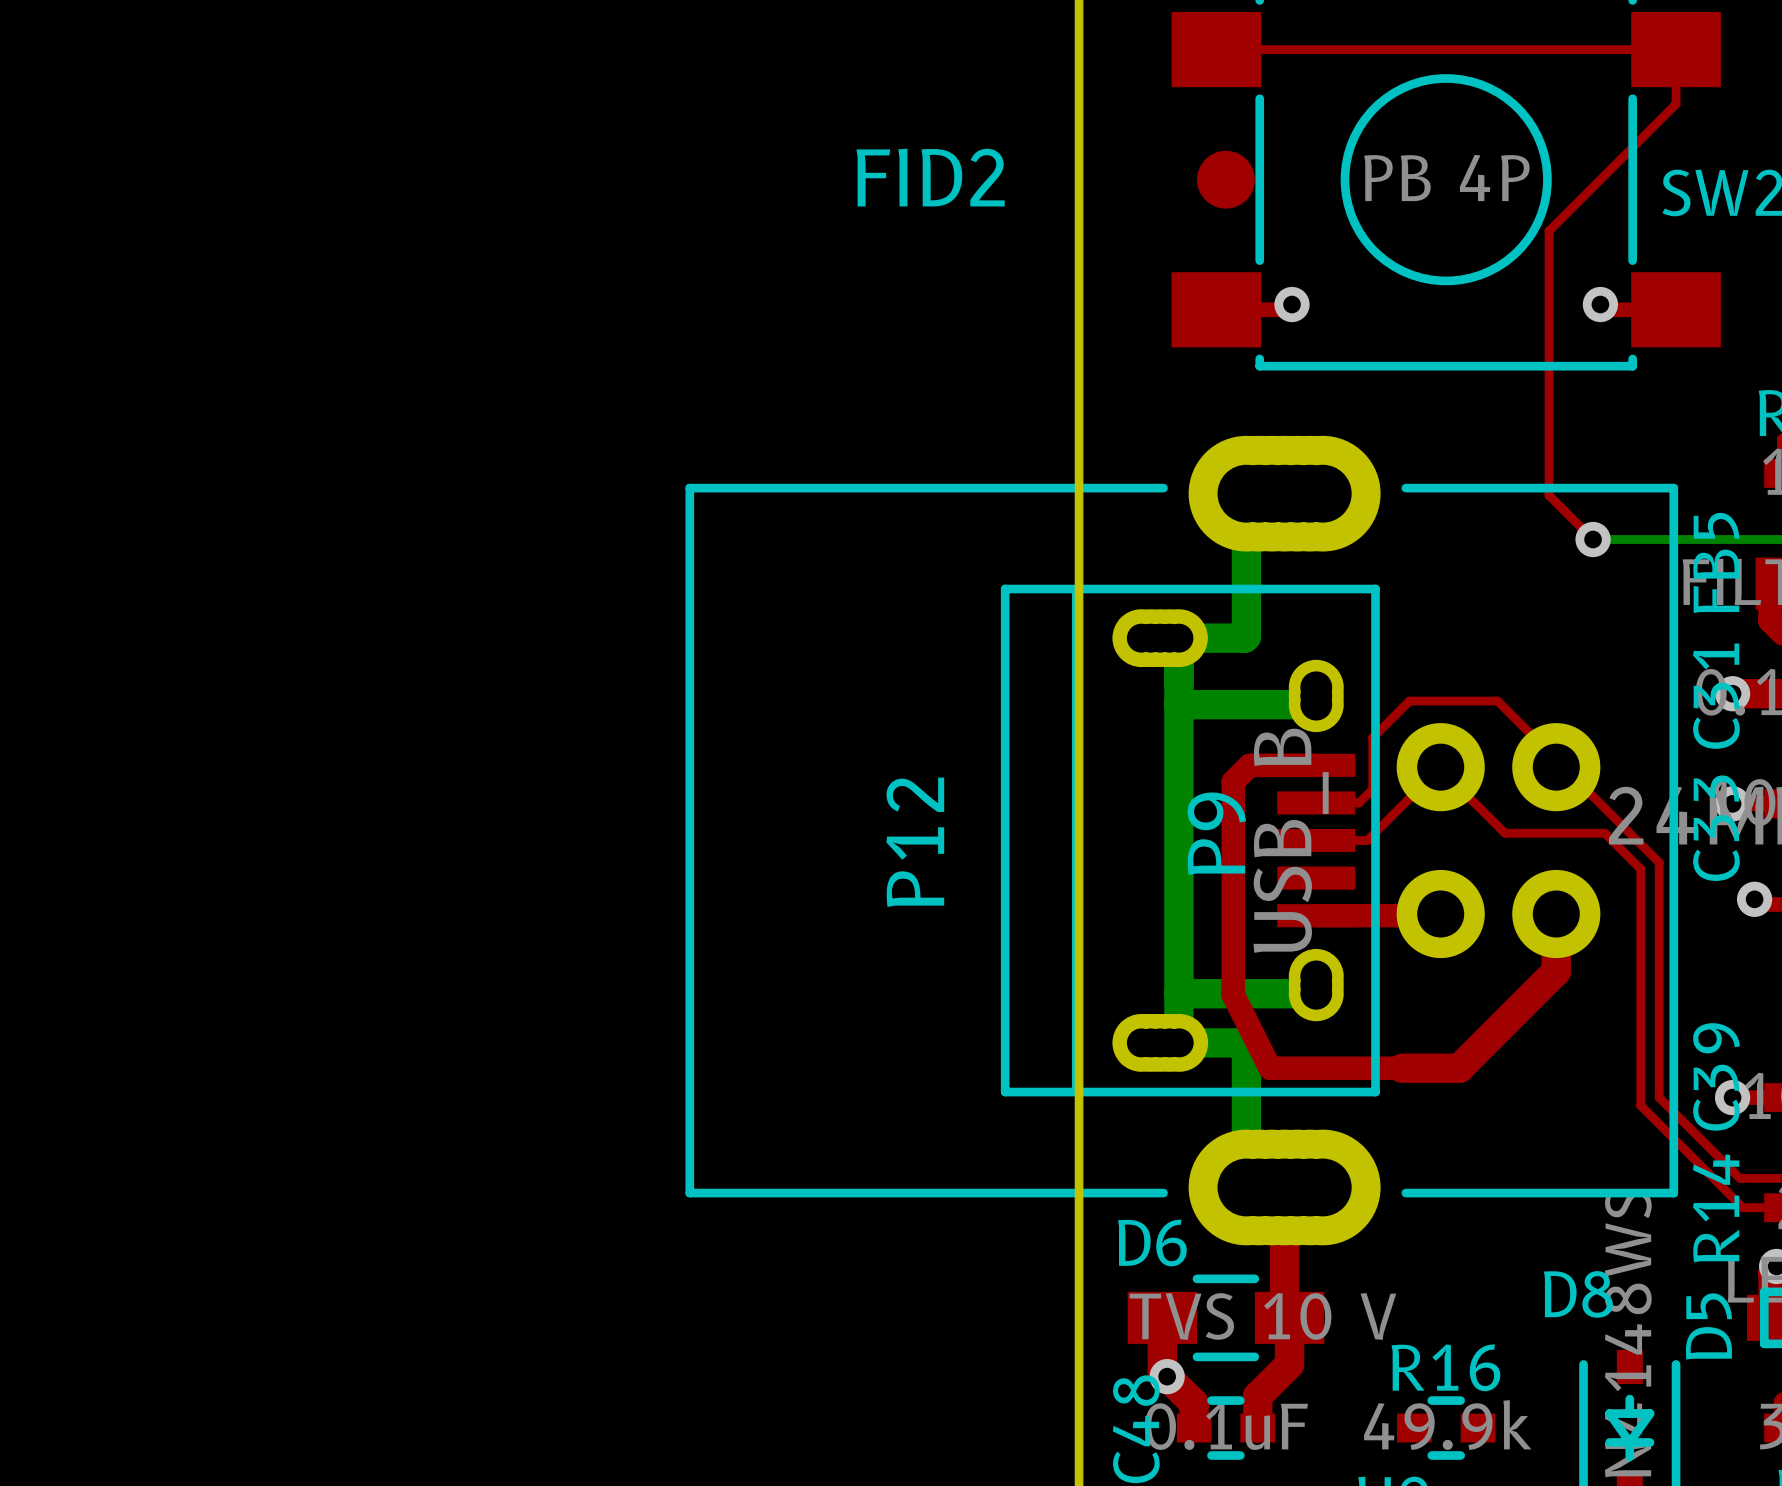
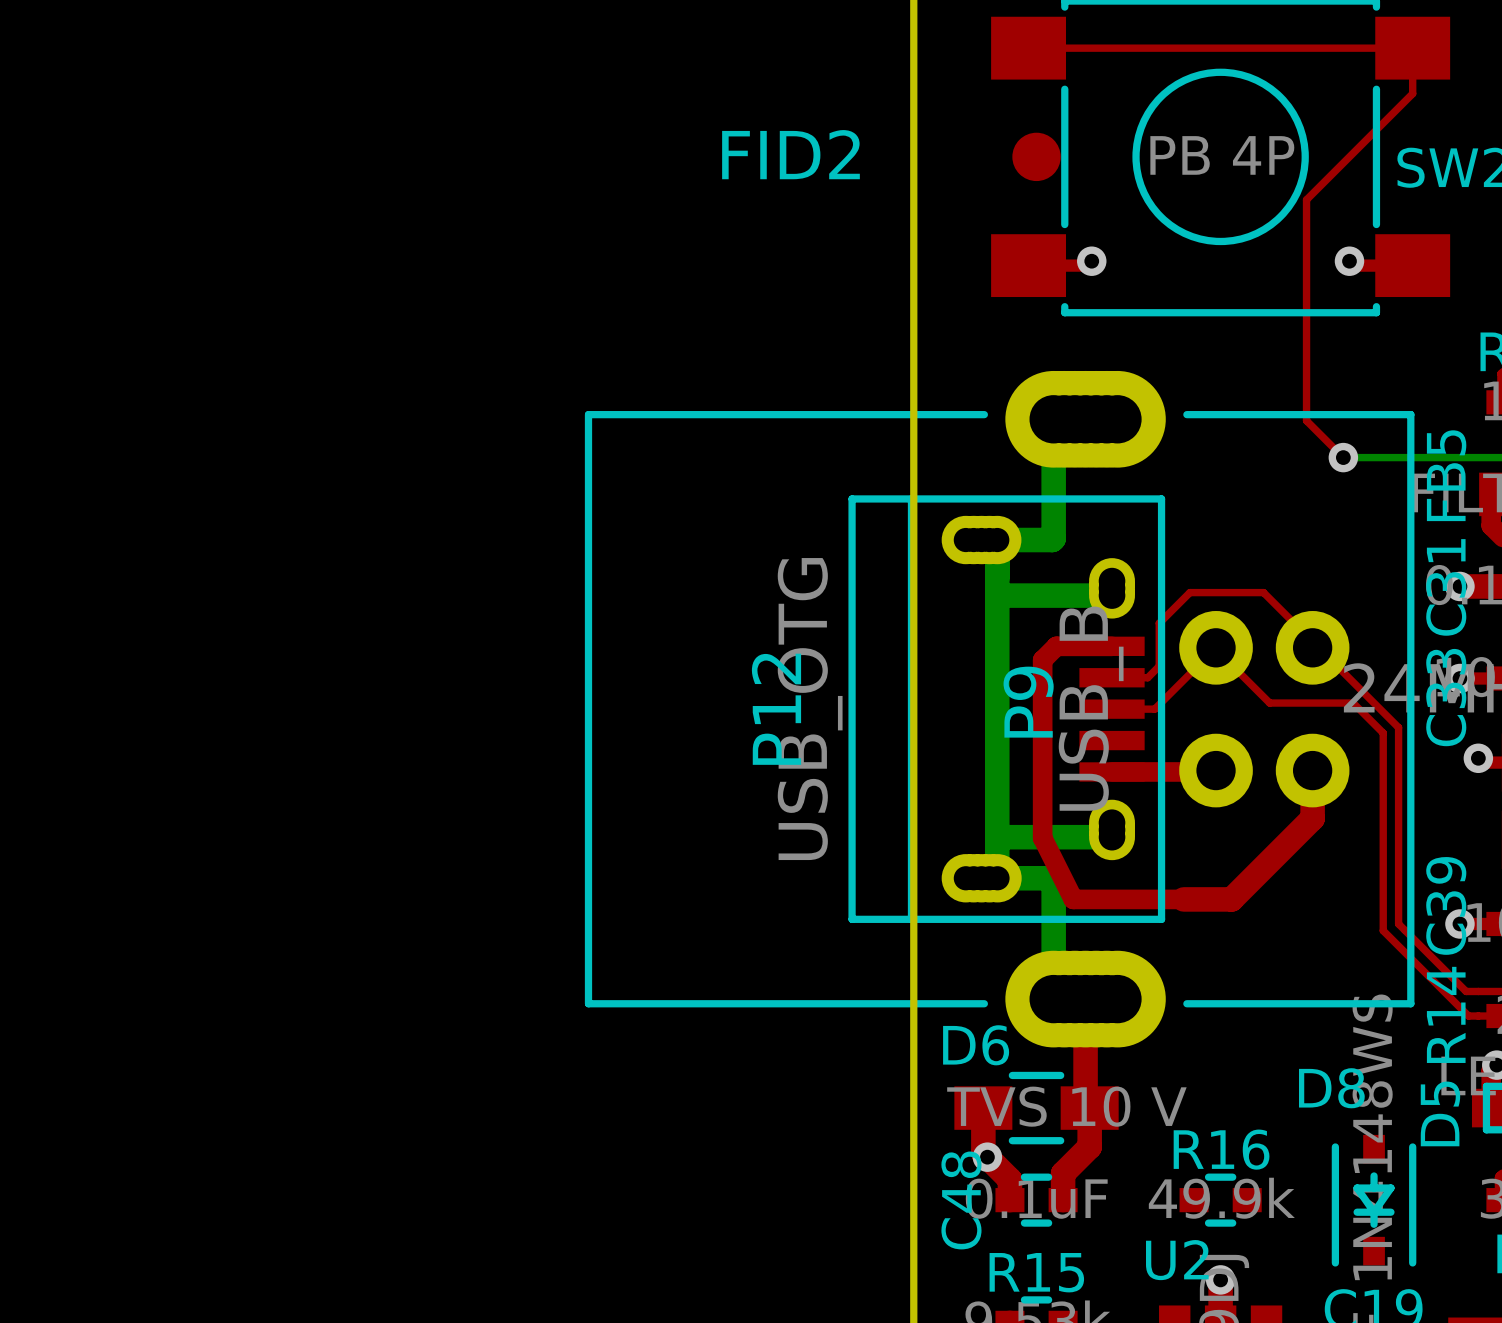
P9 value: none -> USB_OTG (810, 709)

